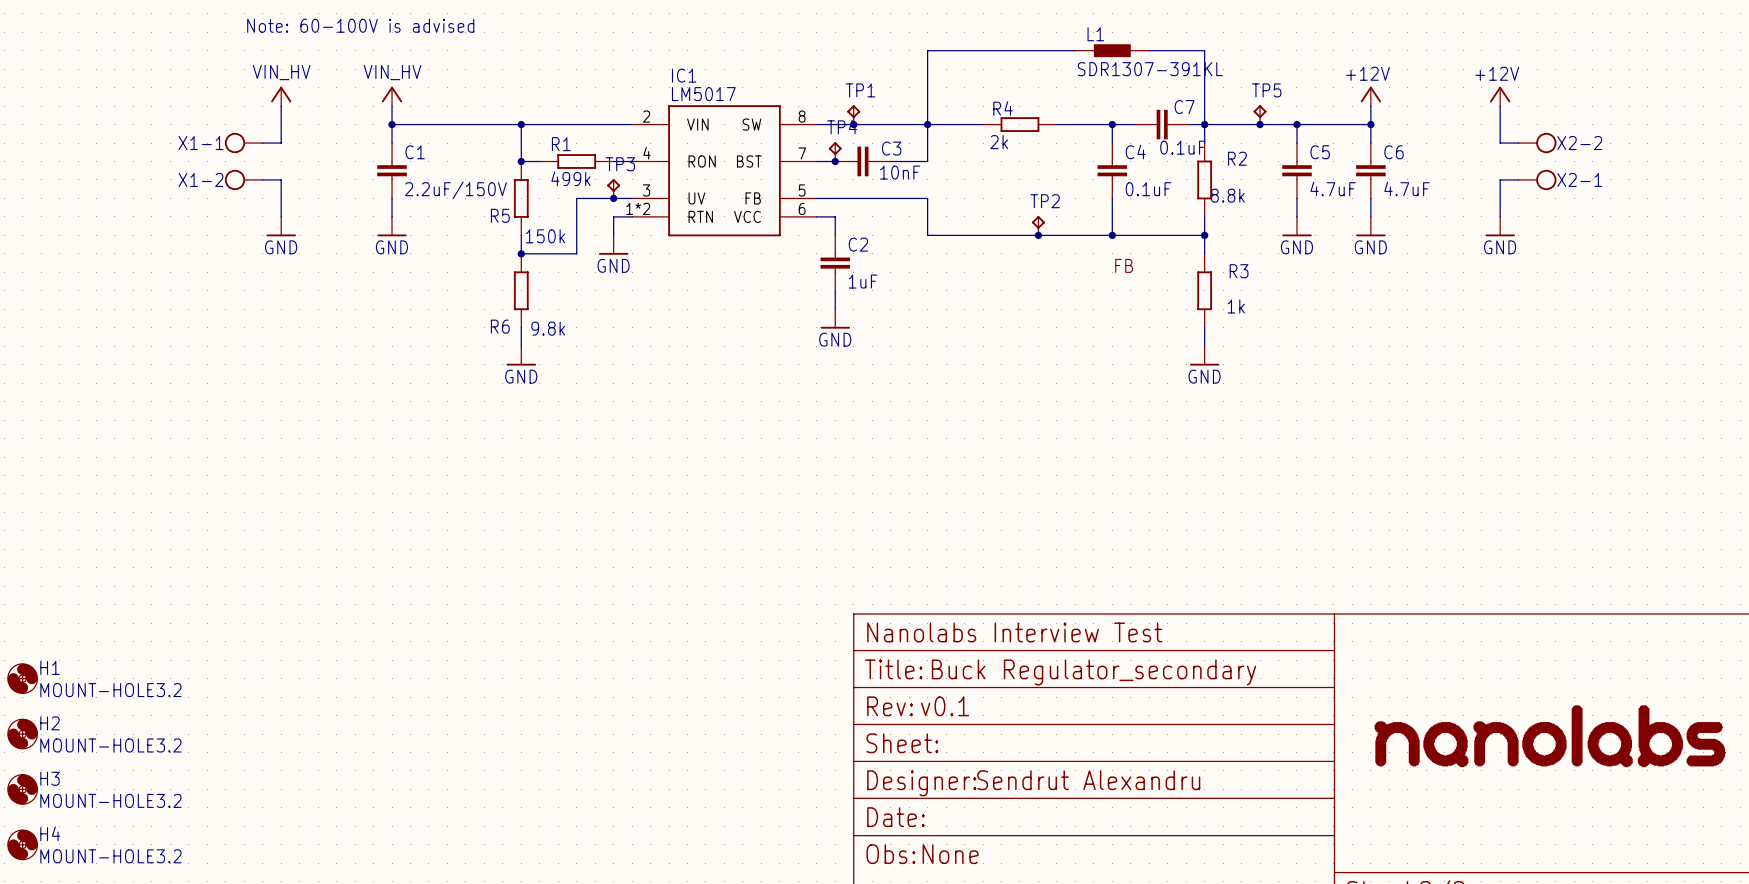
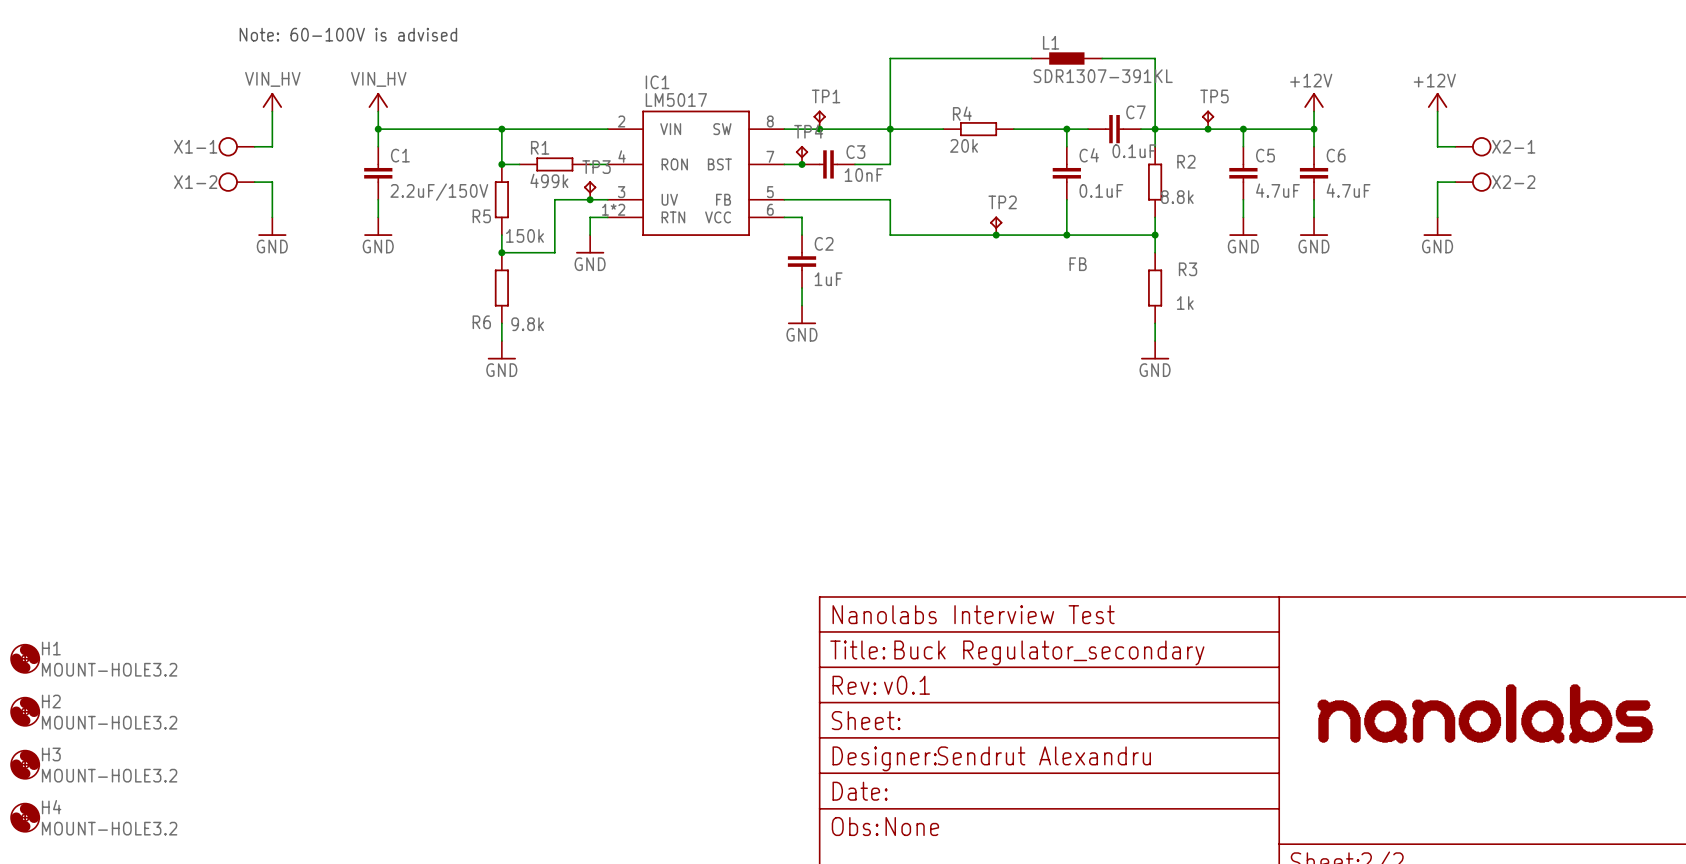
R4 value: 2k (999, 142) -> 20k (964, 145)
X2-2 name: X2-2 (1579, 143) -> X2-1 (1513, 146)
X2-1 name: X2-1 (1579, 179) -> X2-2 (1513, 182)

